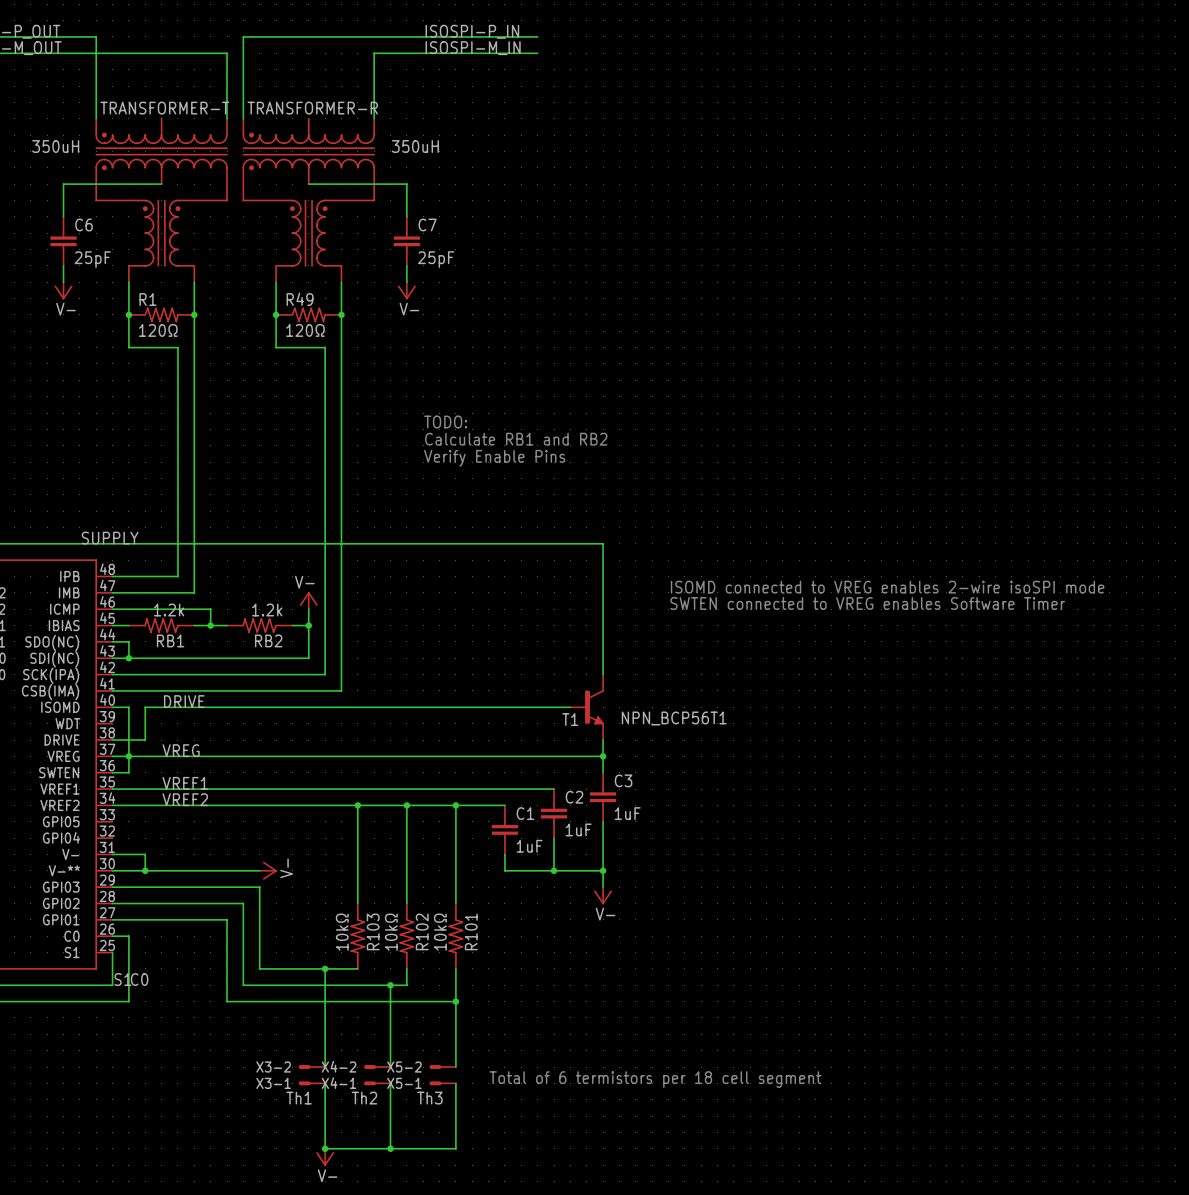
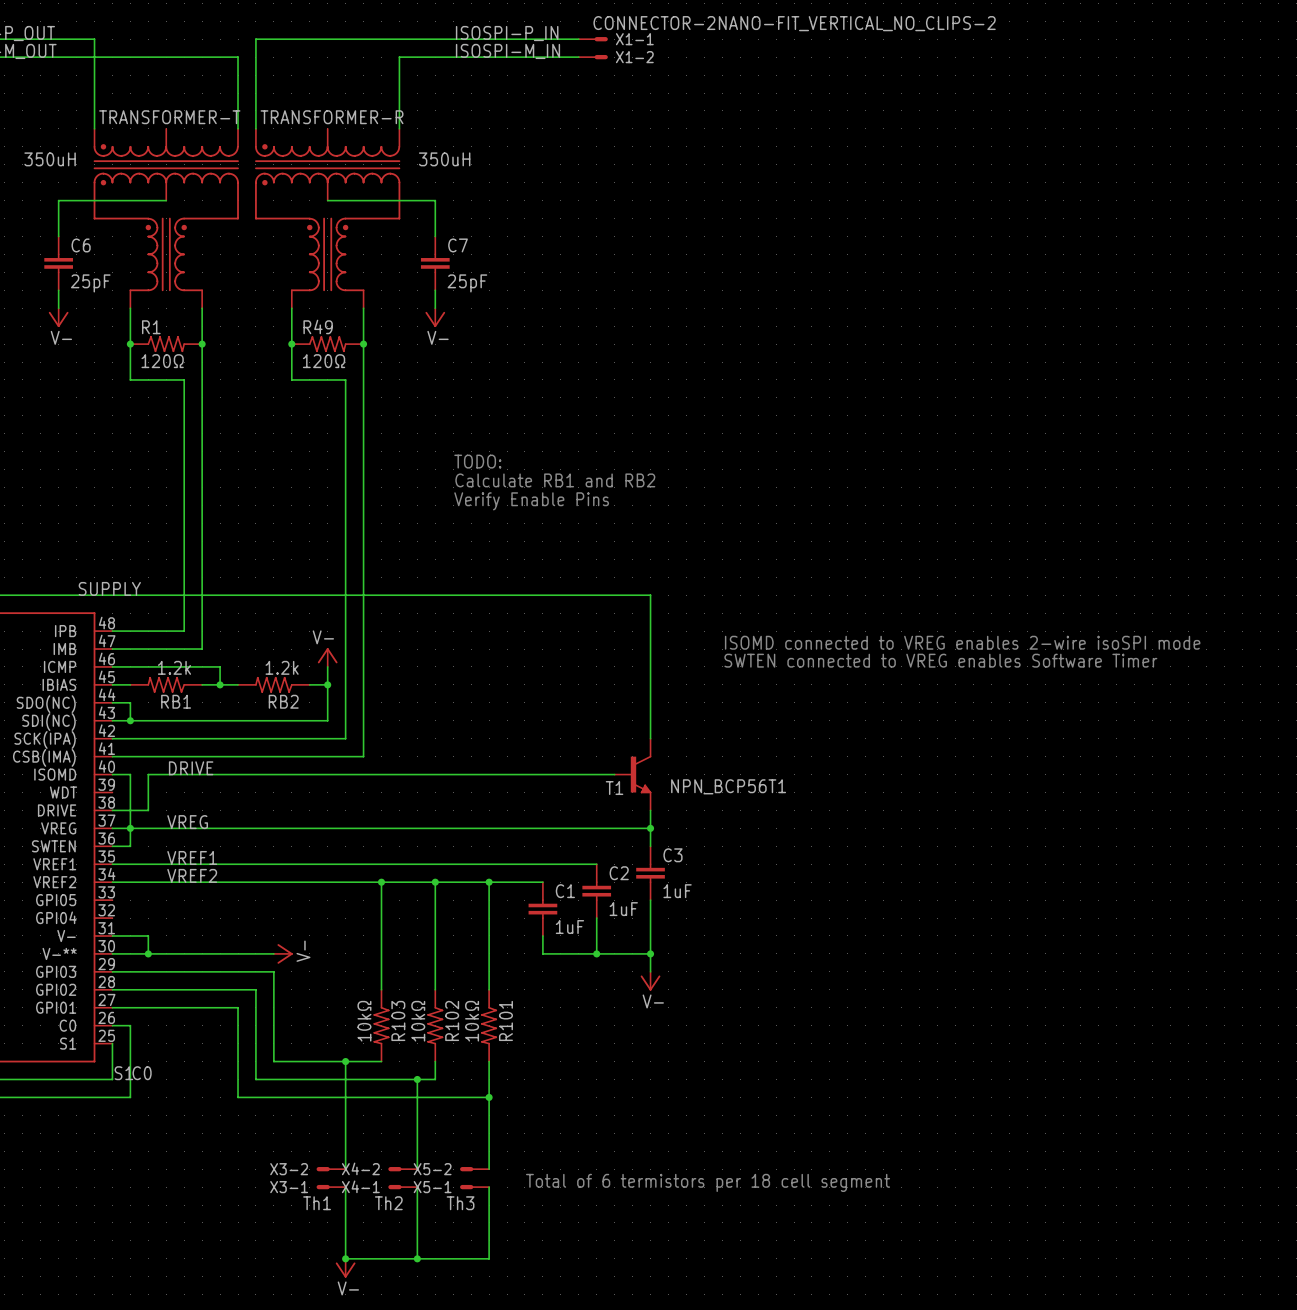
X1-1: none -> CONNECTOR-2NANO-FIT_VERTICAL_NO_CLIPS-2 (593, 39)
X1-2: none -> (593, 57)

